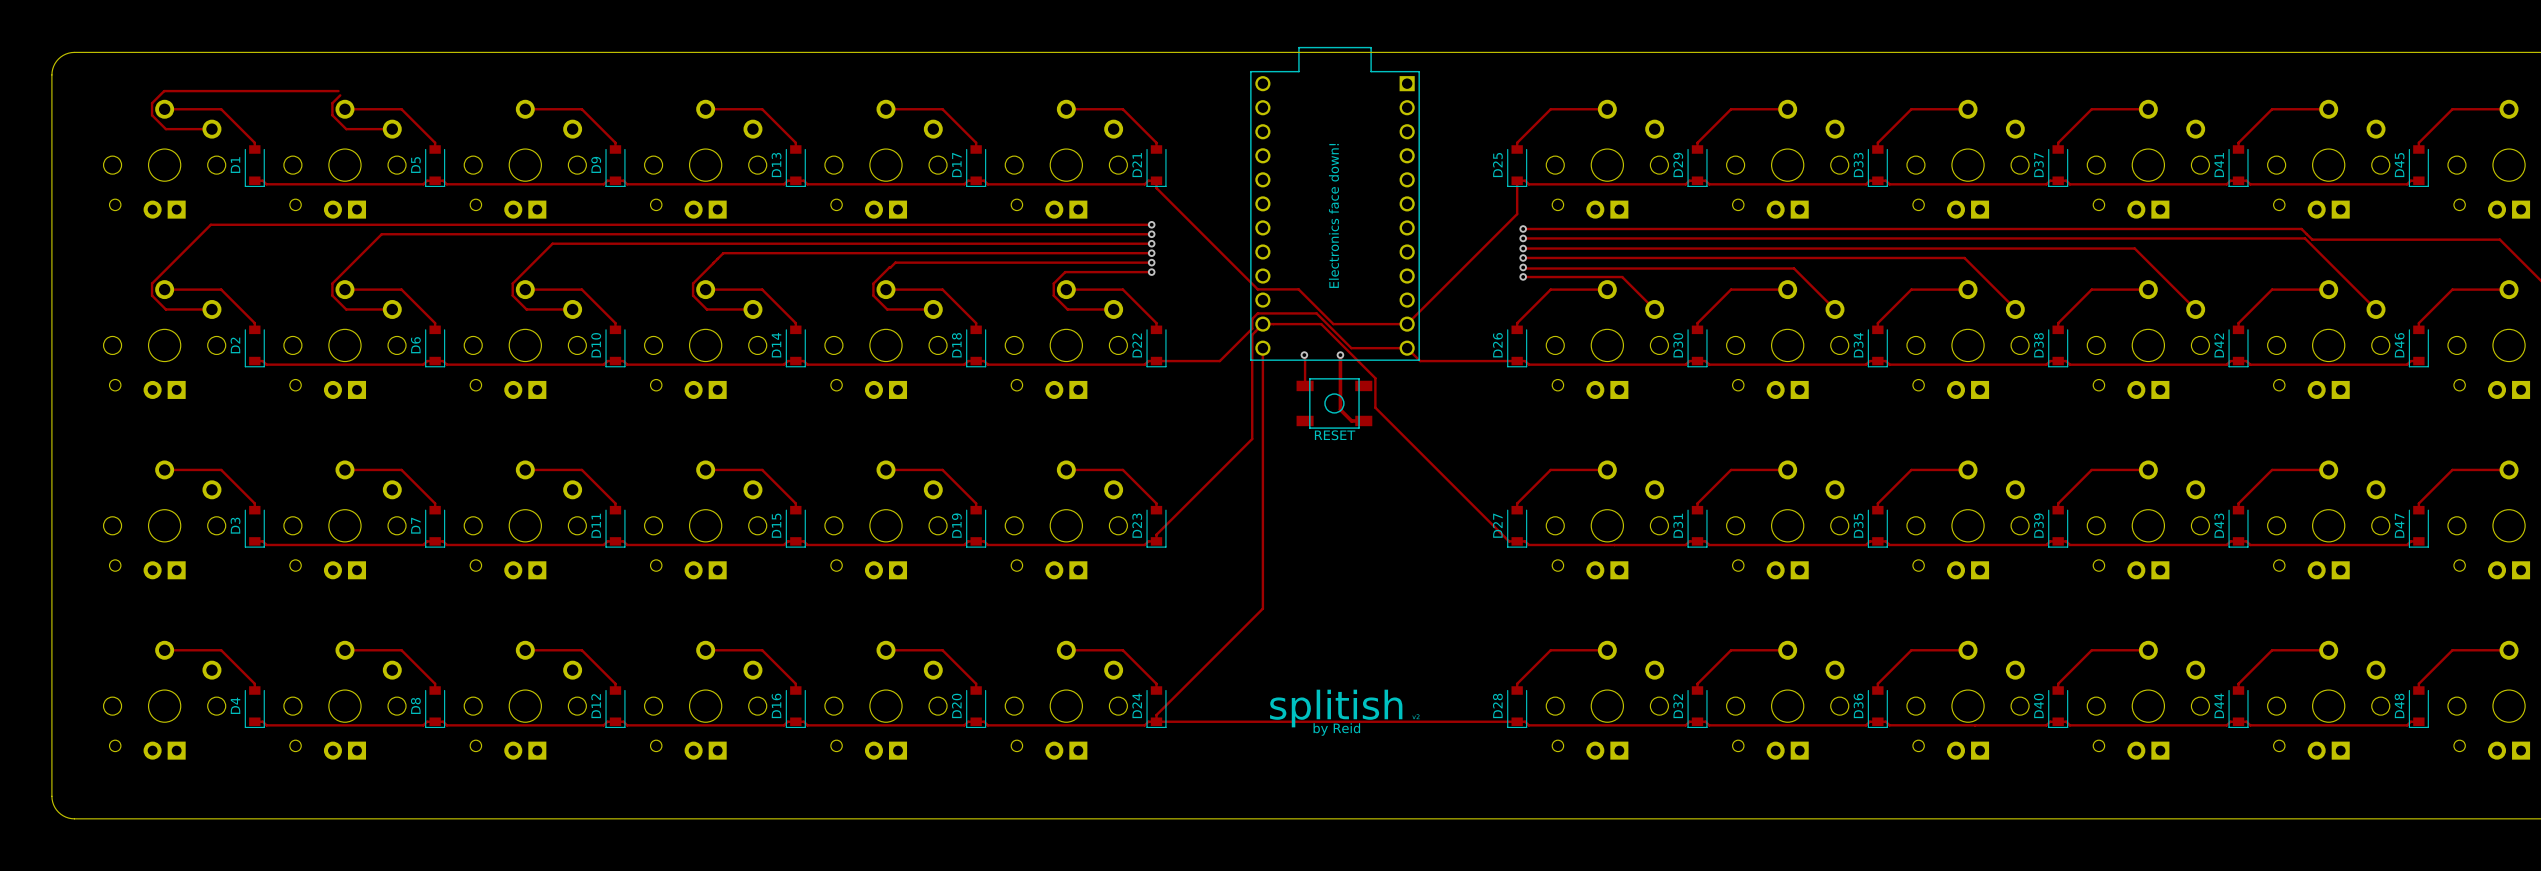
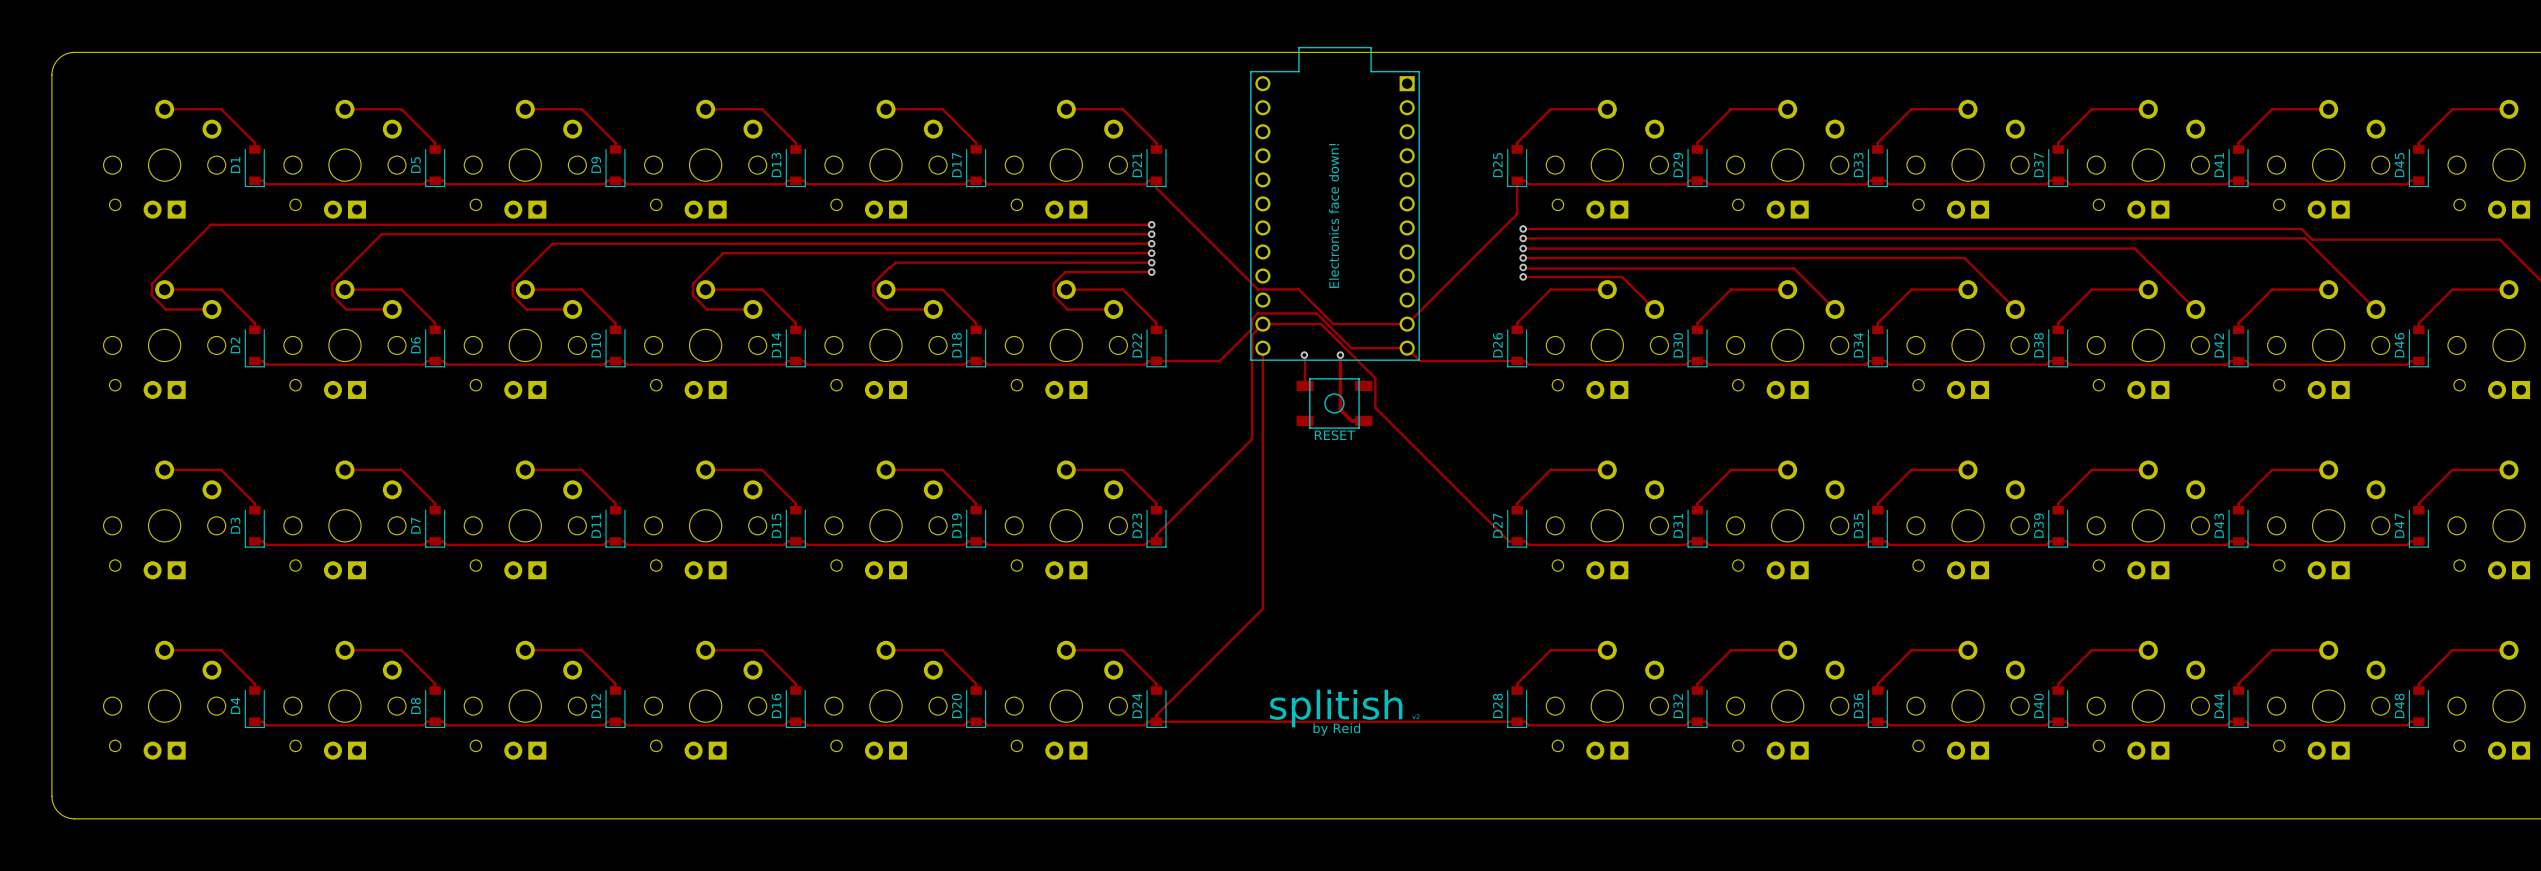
track: (338, 91) (164, 91) (152, 103) (152, 115) (165, 129) (211, 129) -> none
track: (340, 95) (332, 103) (332, 115) (346, 129) (392, 129) -> none

